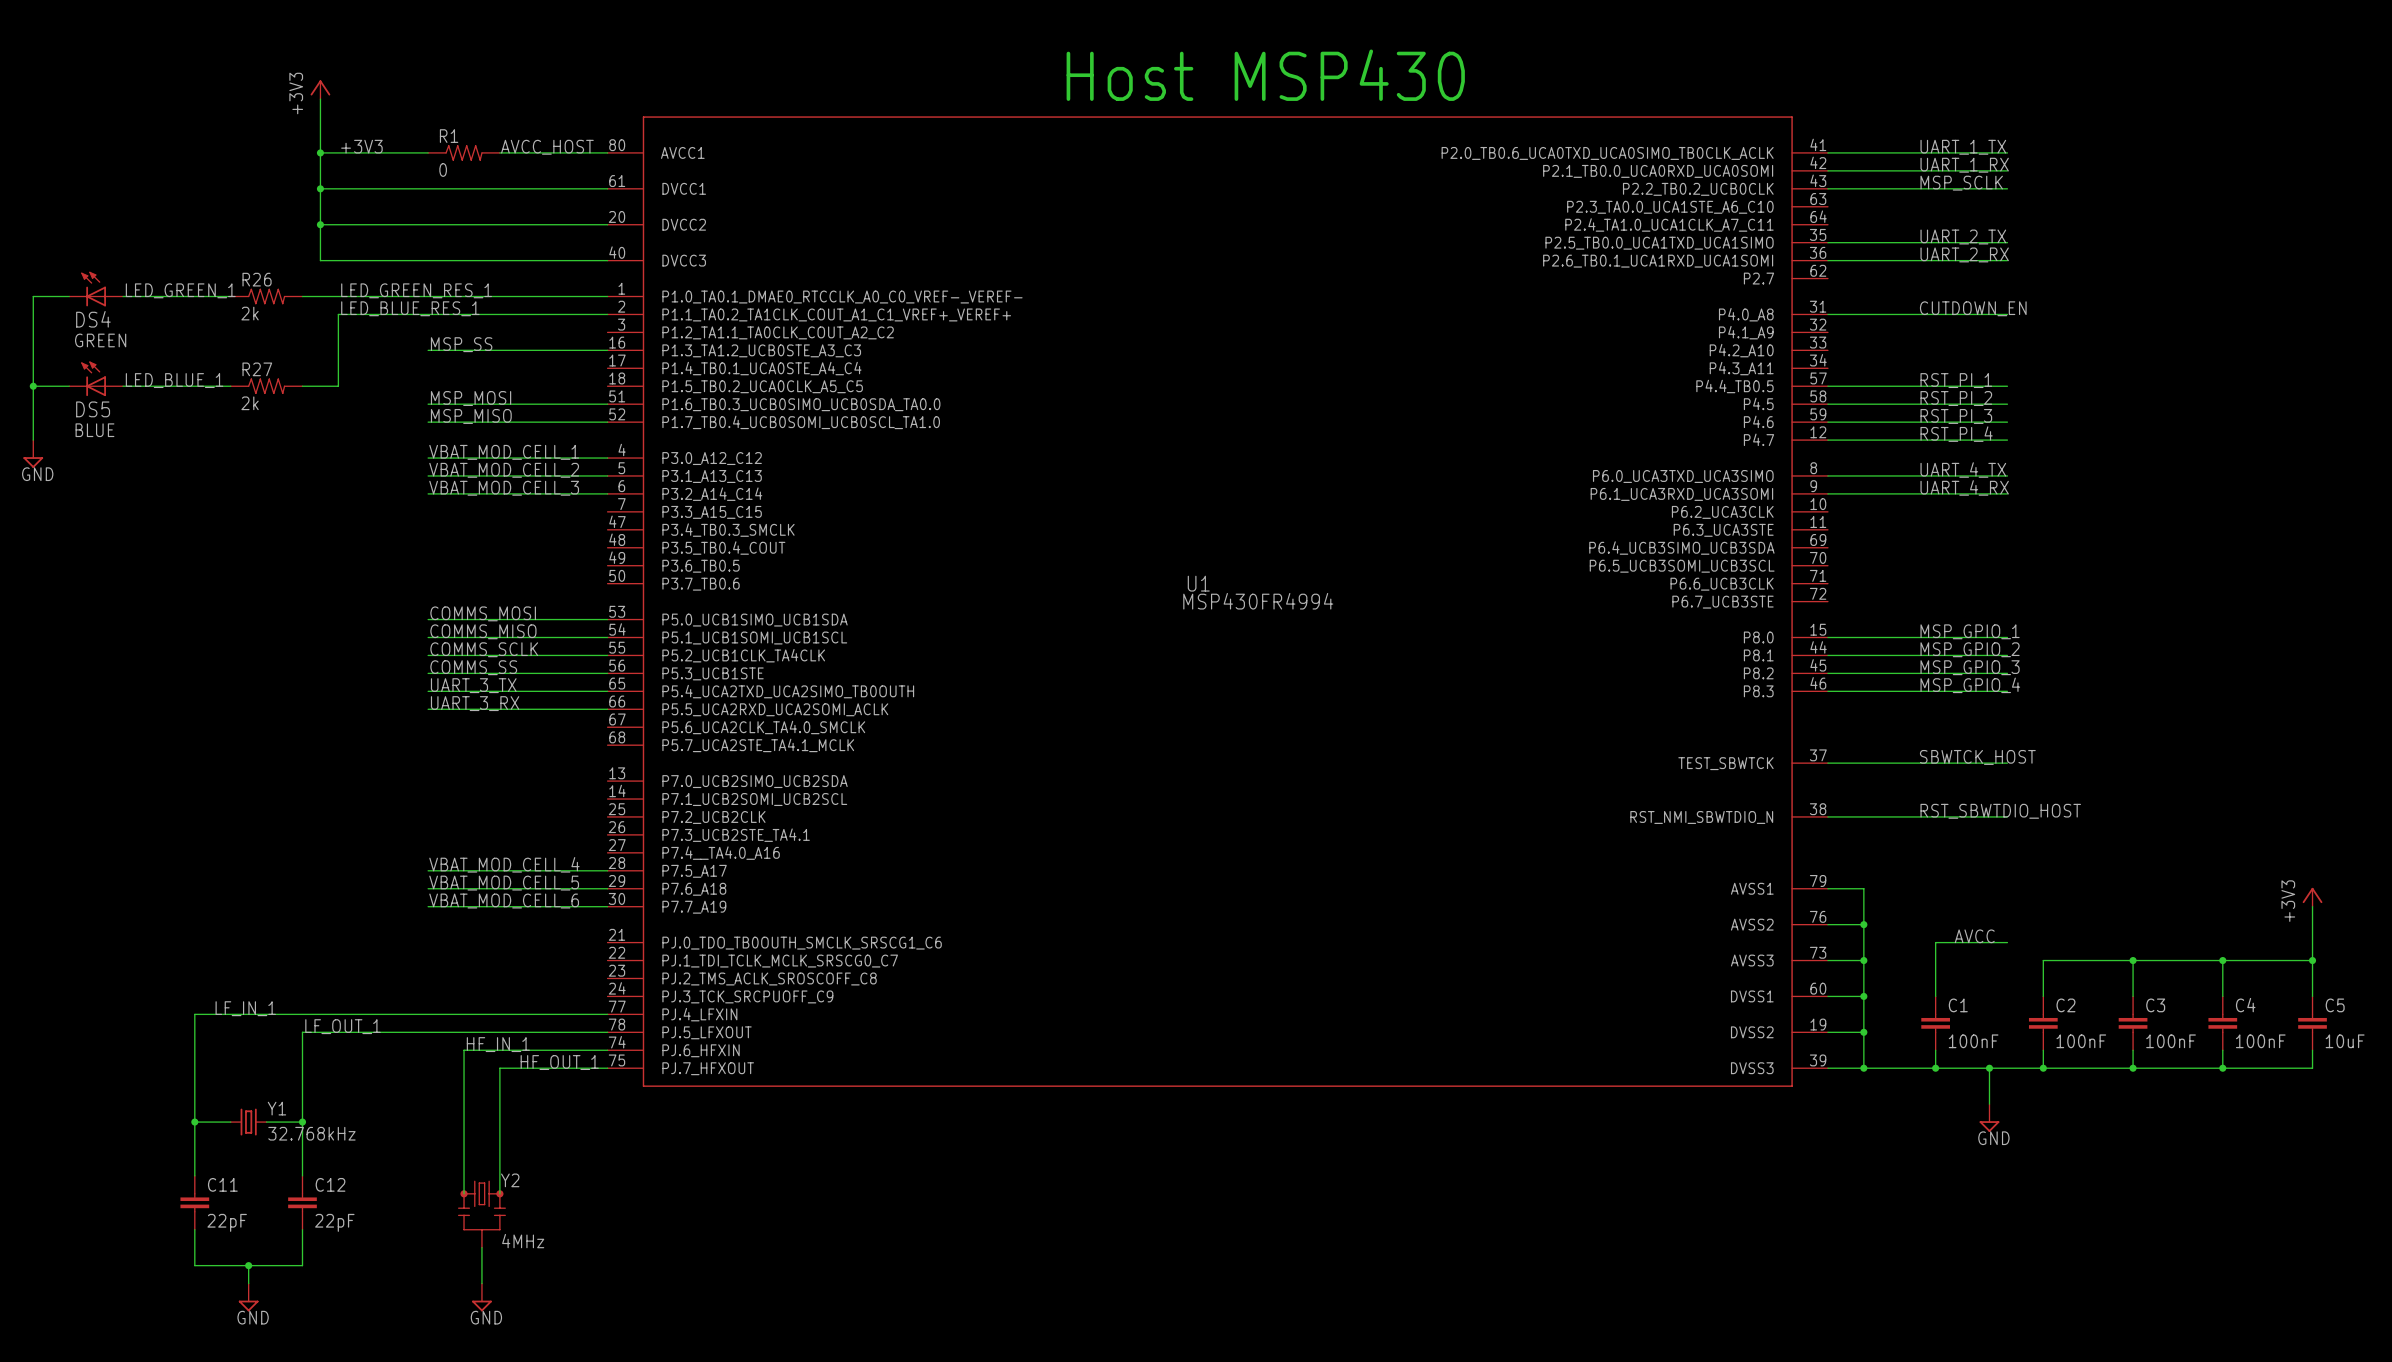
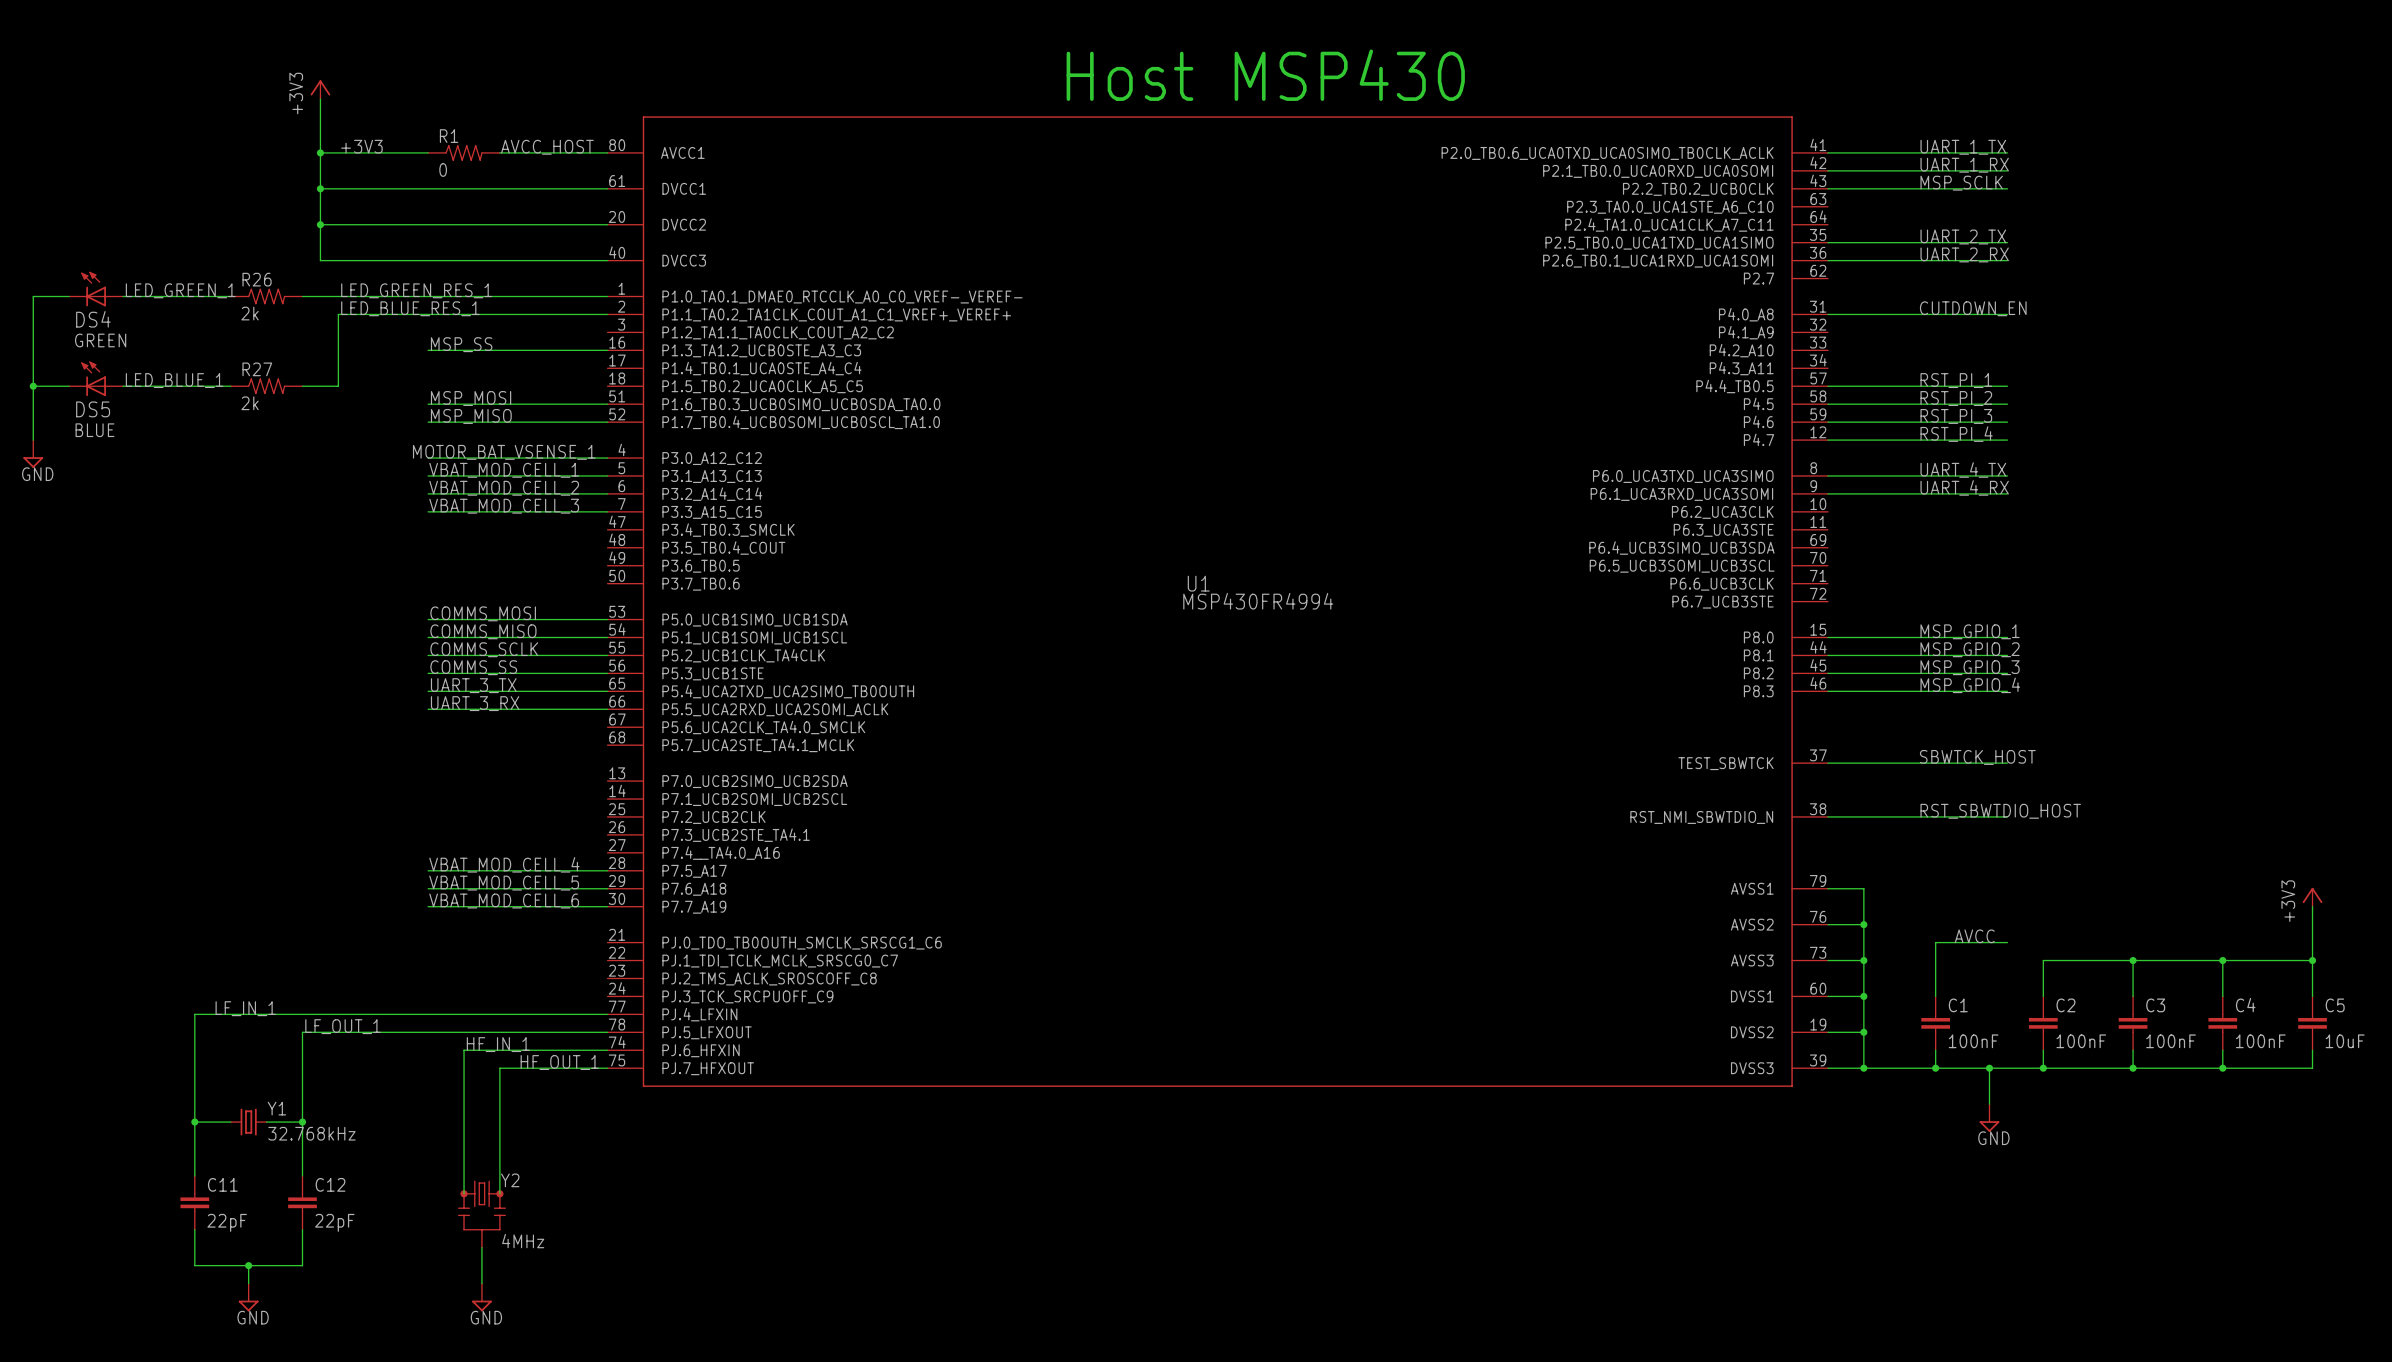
label: VBAT_MOD_CELL_1 (504, 452) -> none
label: none -> MOTOR_BAT_VSENSE_1 (504, 452)
label: VBAT_MOD_CELL_2 (504, 470) -> VBAT_MOD_CELL_1 (504, 470)
label: VBAT_MOD_CELL_3 (504, 488) -> VBAT_MOD_CELL_2 (504, 488)
label: none -> VBAT_MOD_CELL_3 (504, 506)
wire: none -> (428, 511) (607, 511)

